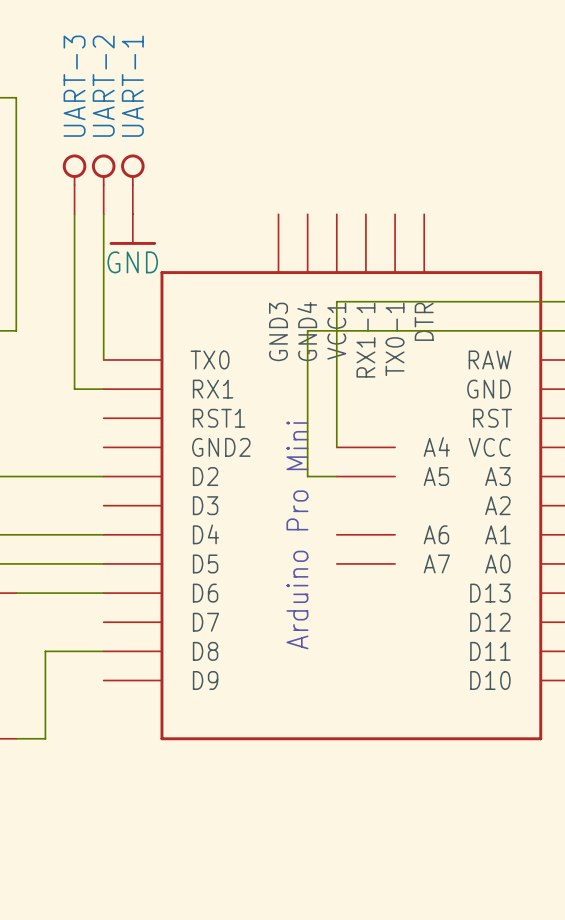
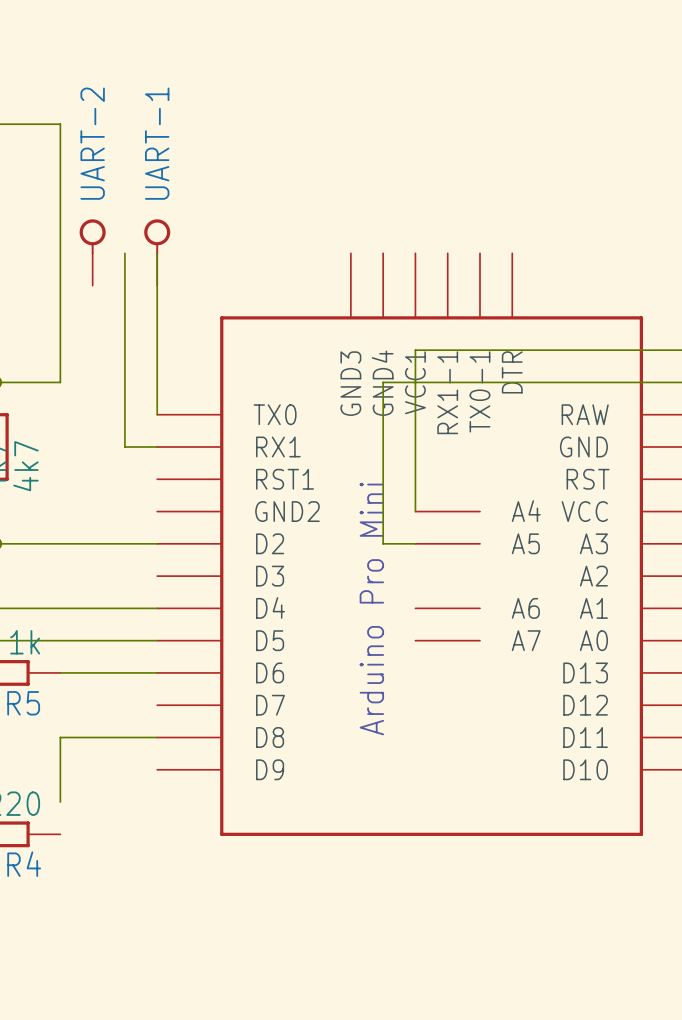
UART-3: (74, 184) -> none
UART-2 position: (103, 184) -> (92, 252)
UART-1 position: (132, 184) -> (157, 252)
power symbol: GND (132, 229) -> none
wire: (45, 651) (45, 738) (16, 738) -> (92, 737) (60, 737) (60, 802)

